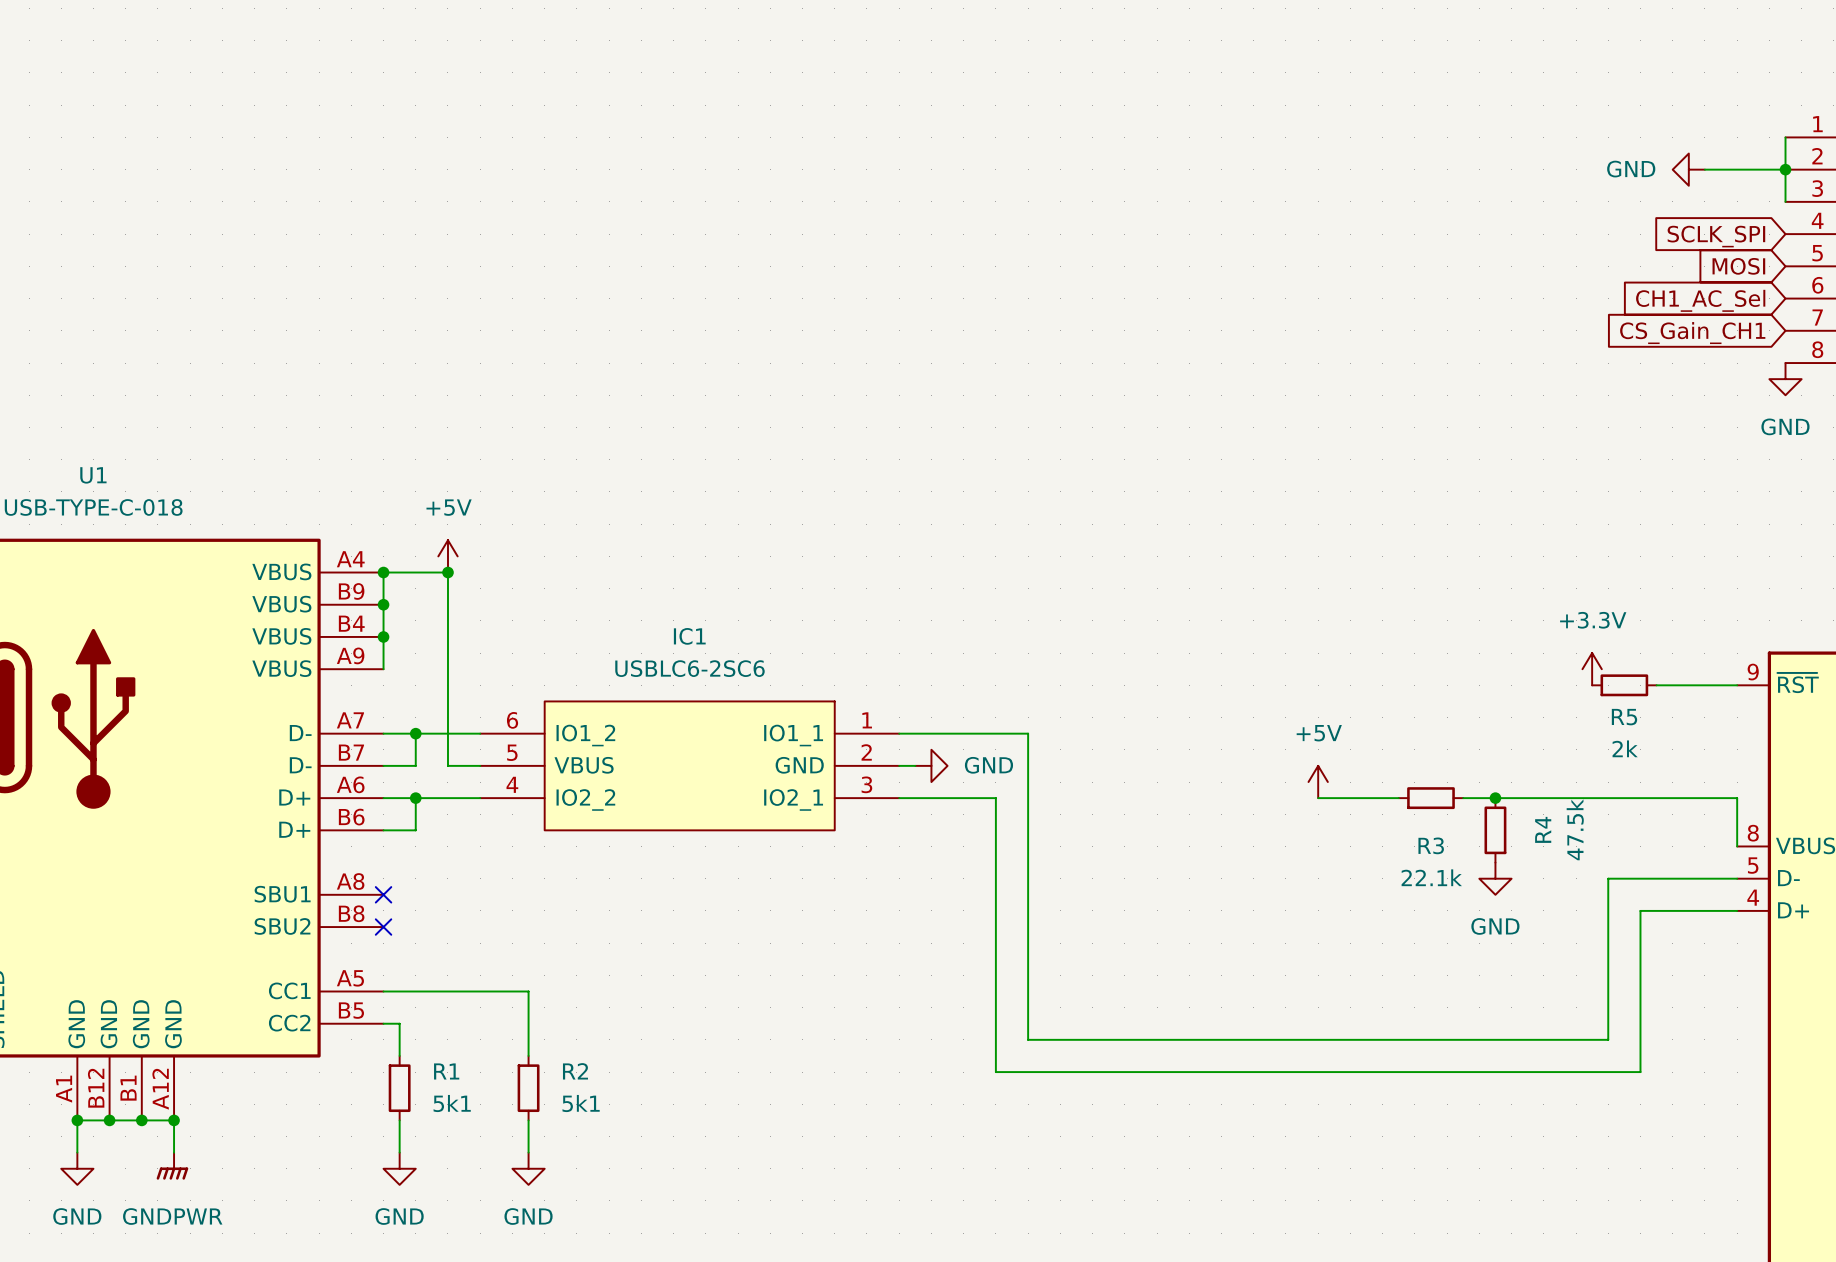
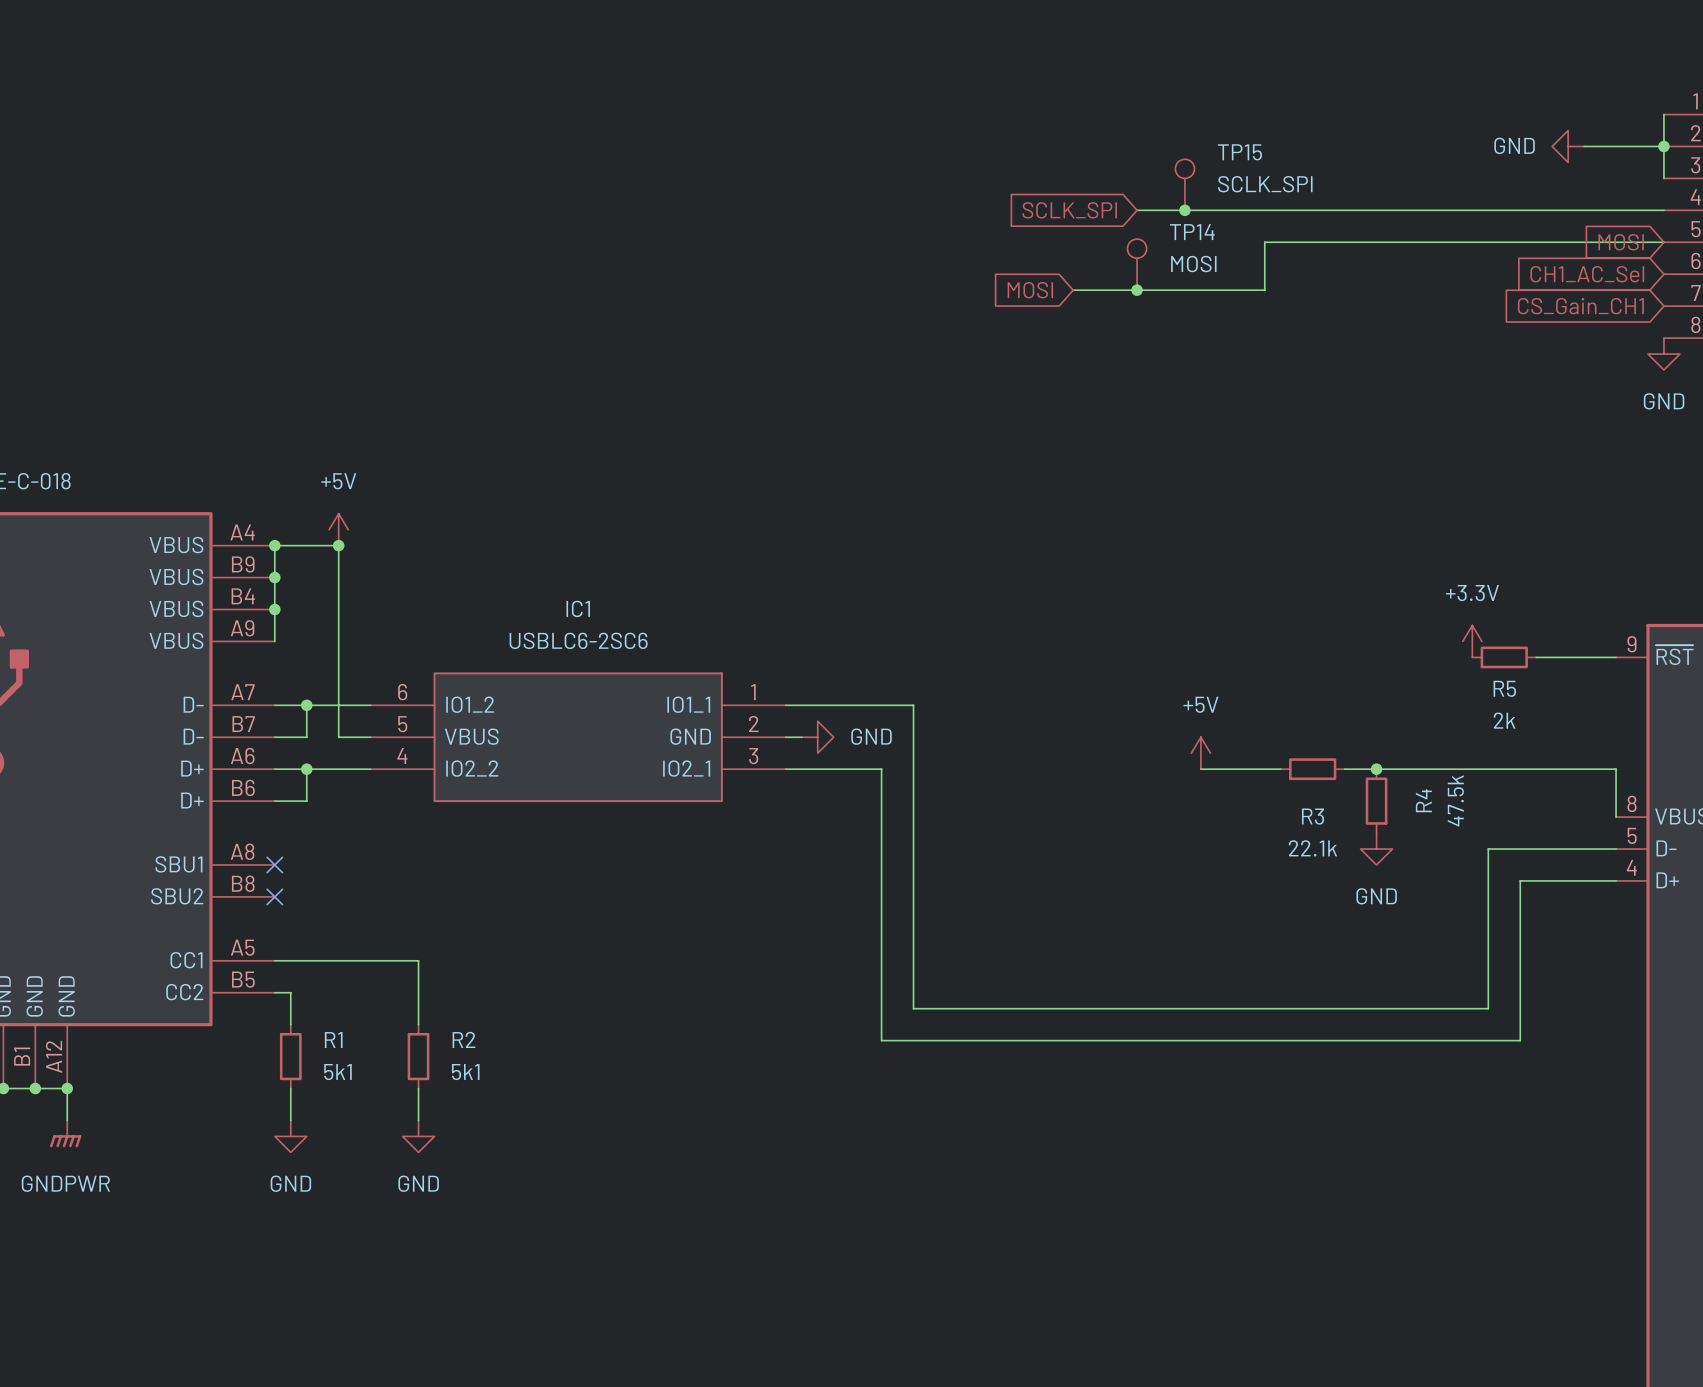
TP15: none -> SCLK_SPI (1184, 184)
wire: none -> (1137, 210) (1663, 210)
junction: none -> (1184, 210)
global label: none -> SCLK_SPI (1069, 210)
global label: SCLK_SPI (1716, 236) -> none
wire: none -> (1663, 242) (1264, 242) (1264, 290) (1073, 290)
TP14: none -> MOSI (1137, 264)
global label: none -> MOSI (1030, 290)
junction: none -> (1137, 290)

